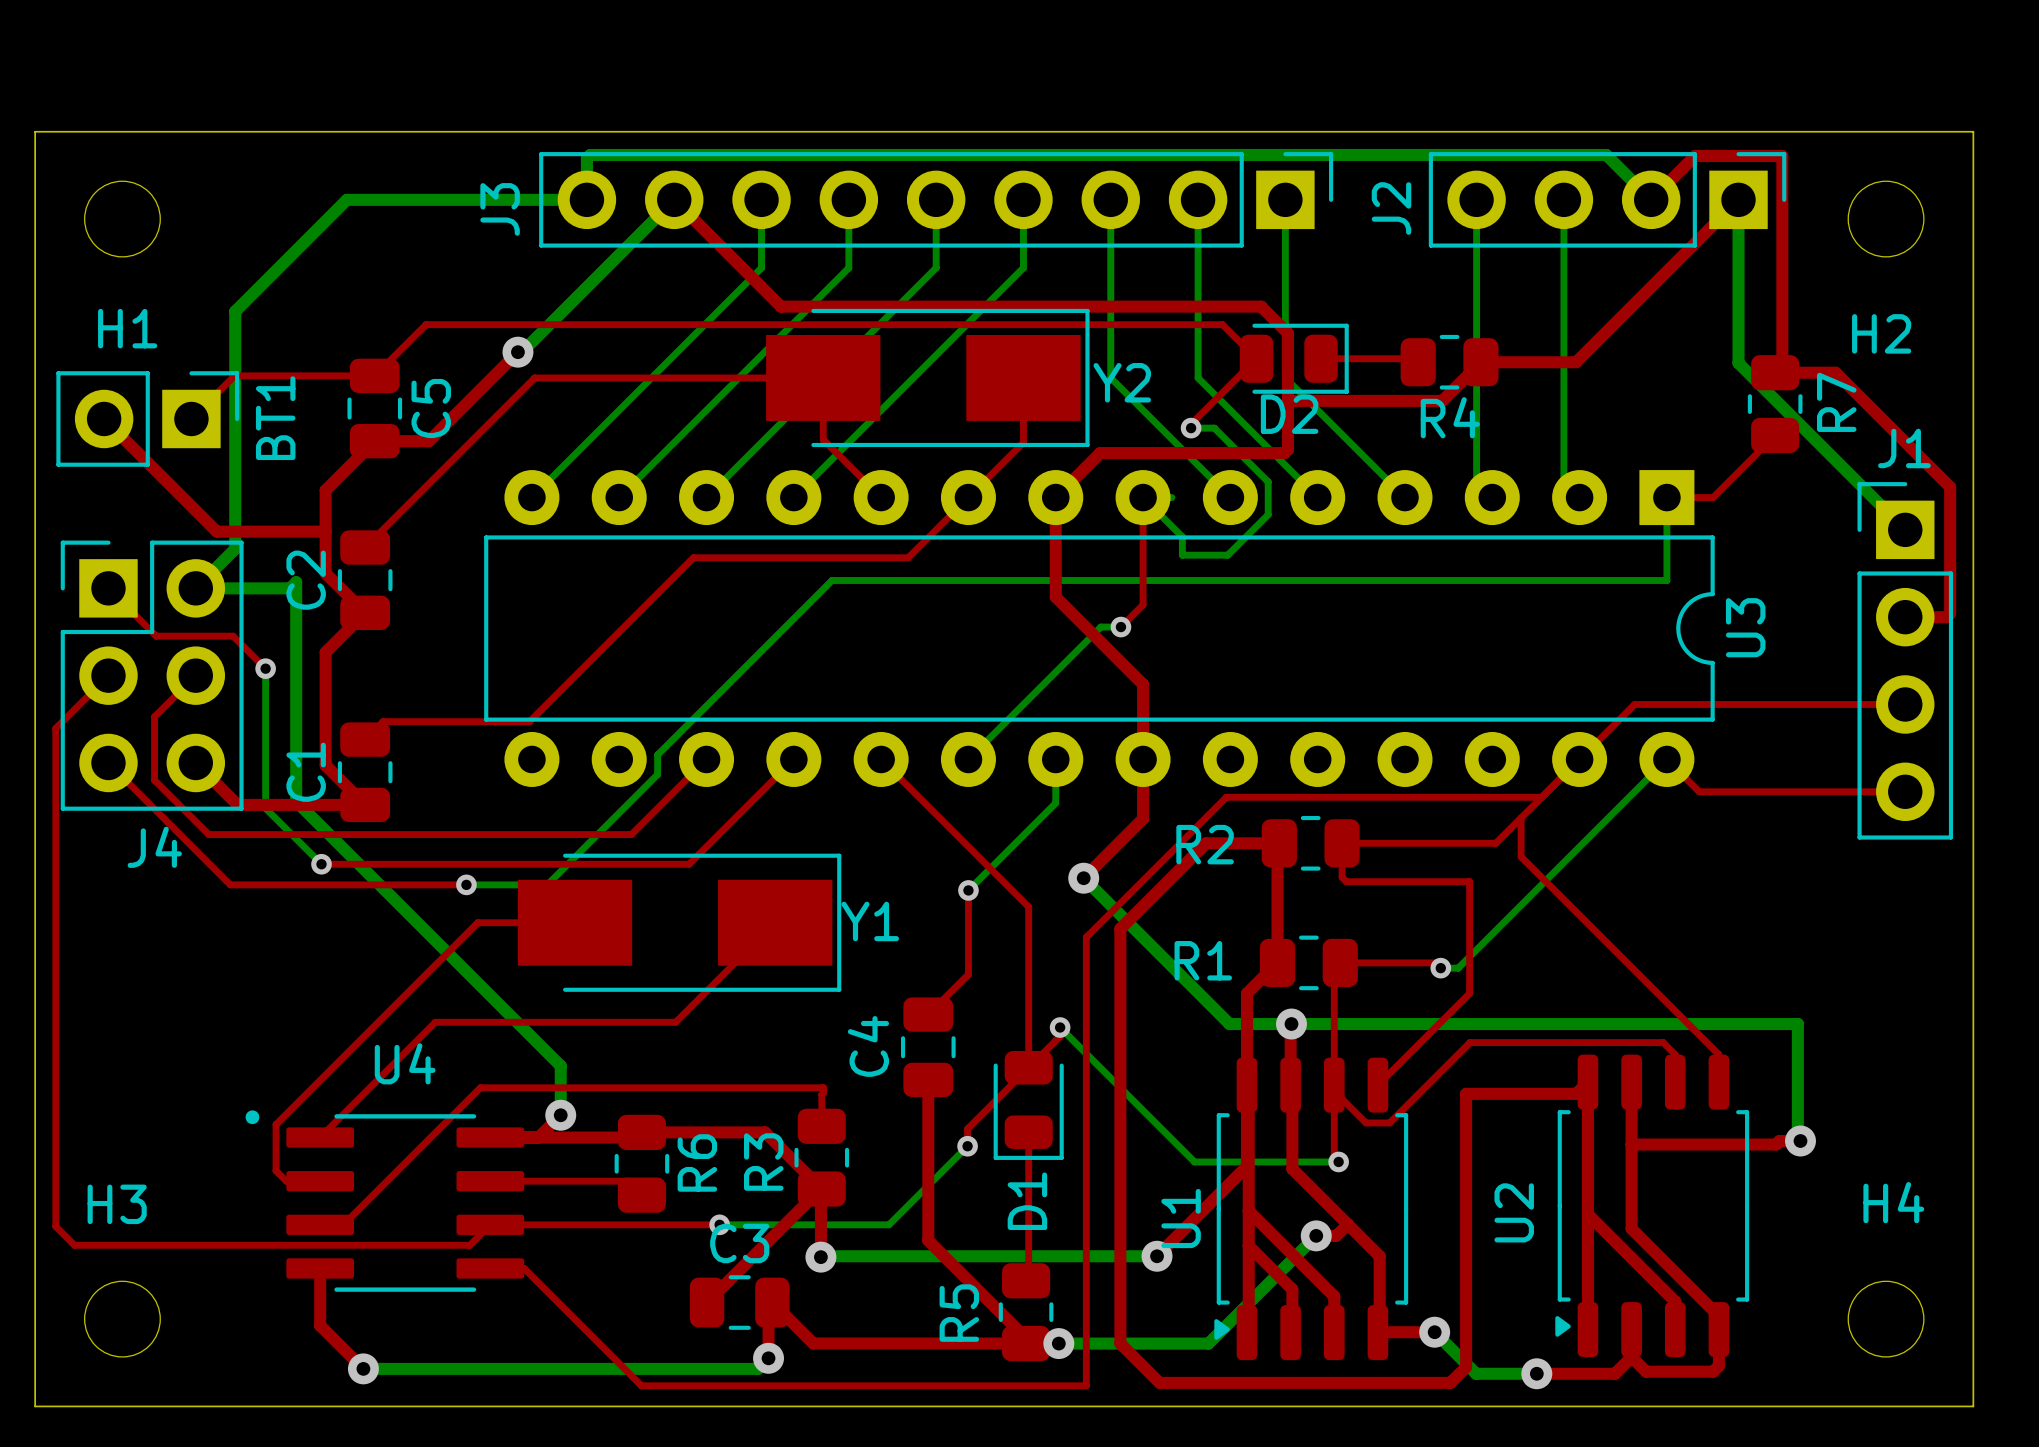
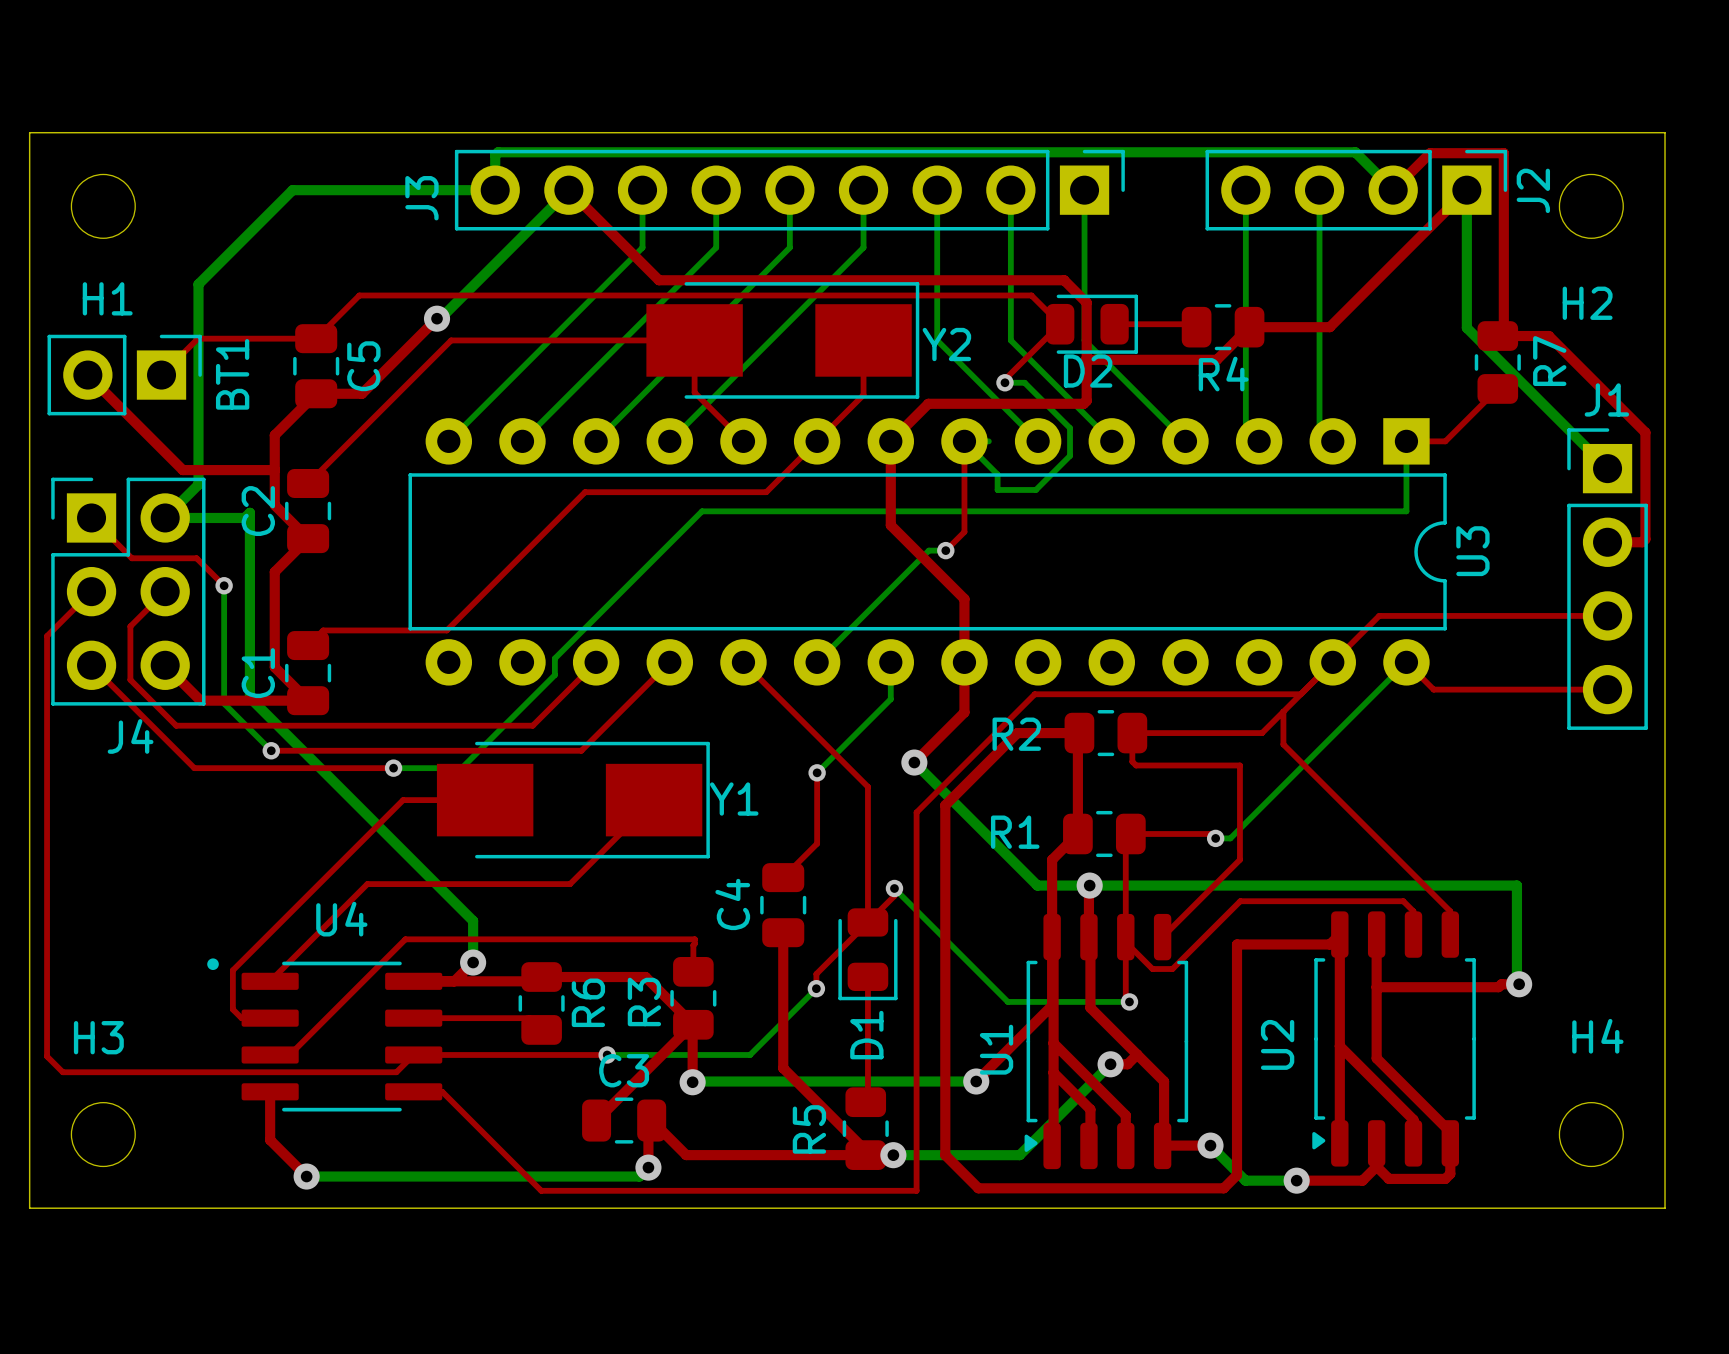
J2 name position: J2 (1391, 208) -> J2 (1533, 190)

